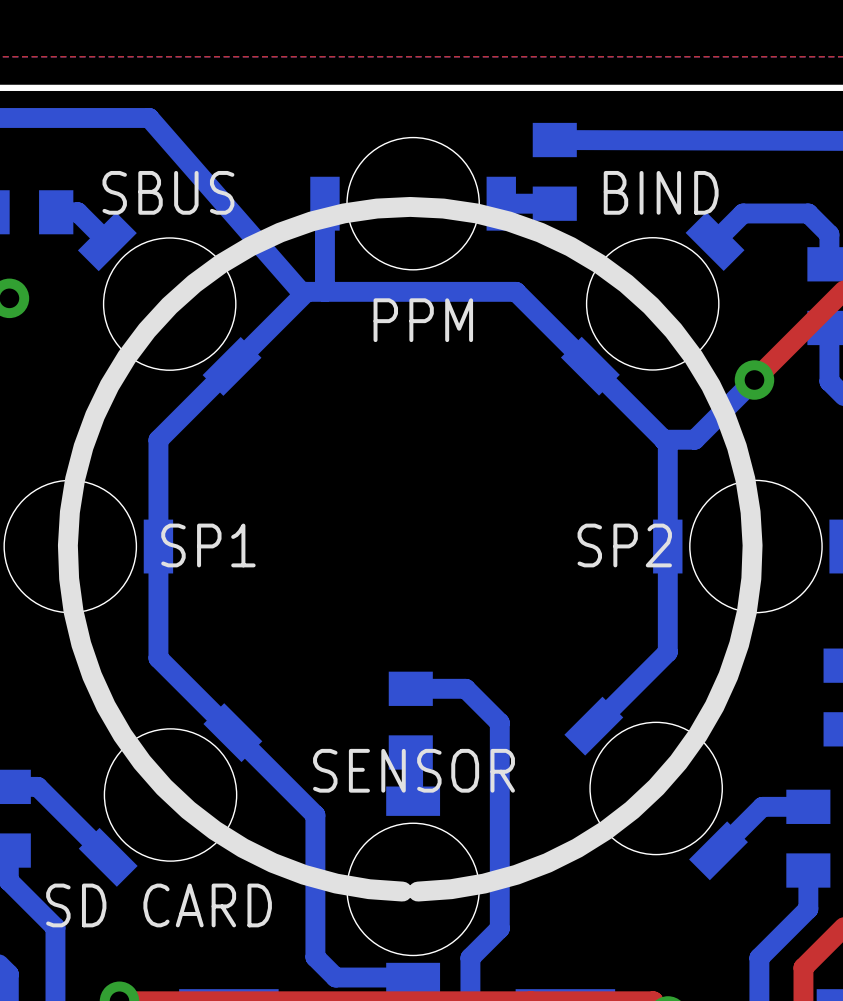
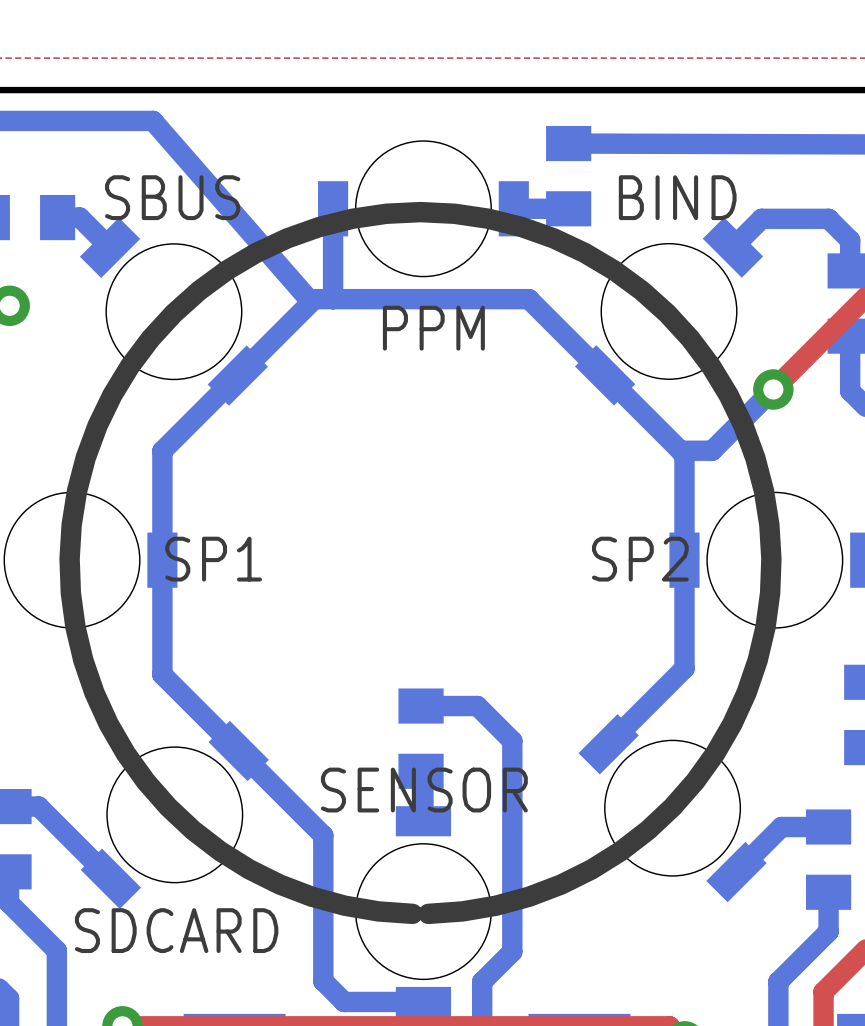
text: SD CARD (159, 905) -> SDCARD (176, 930)

